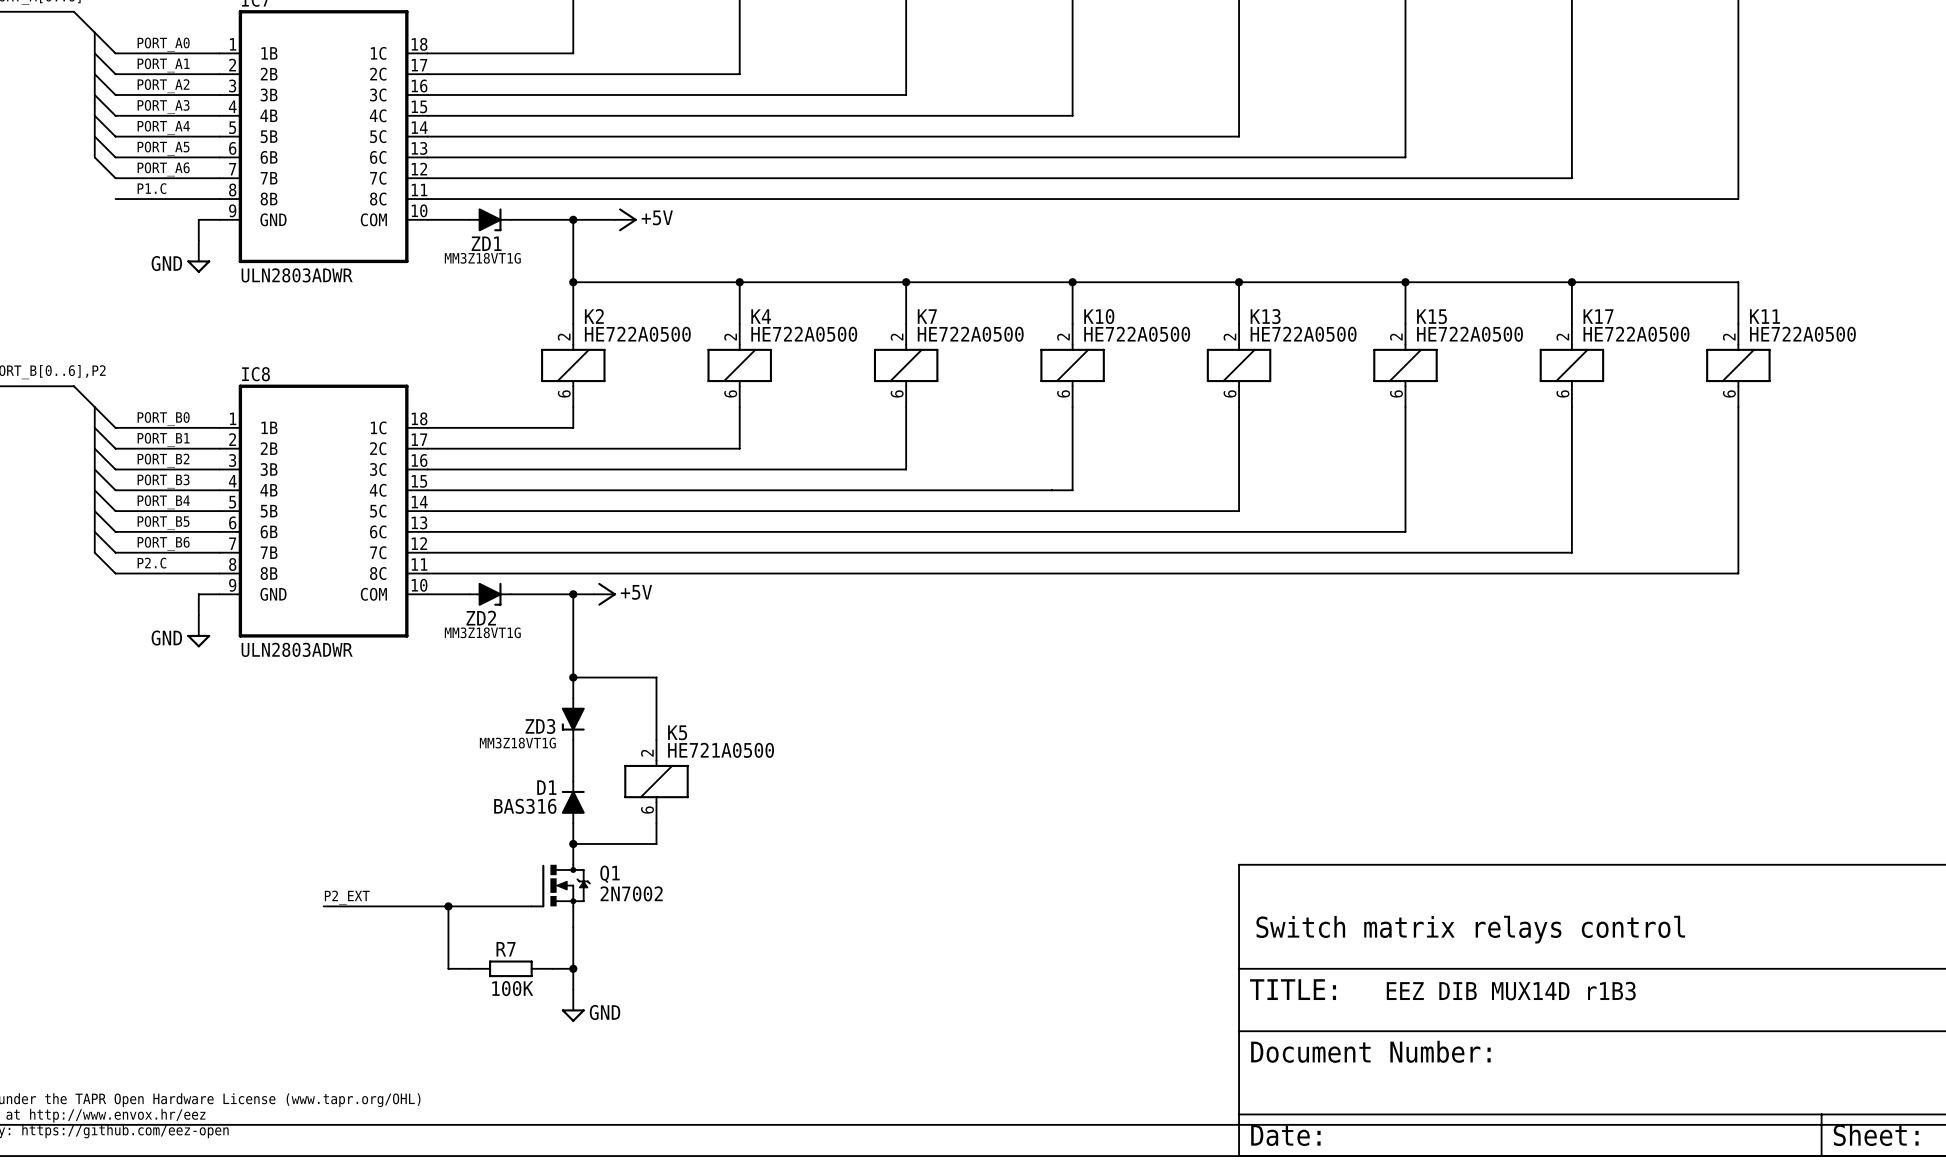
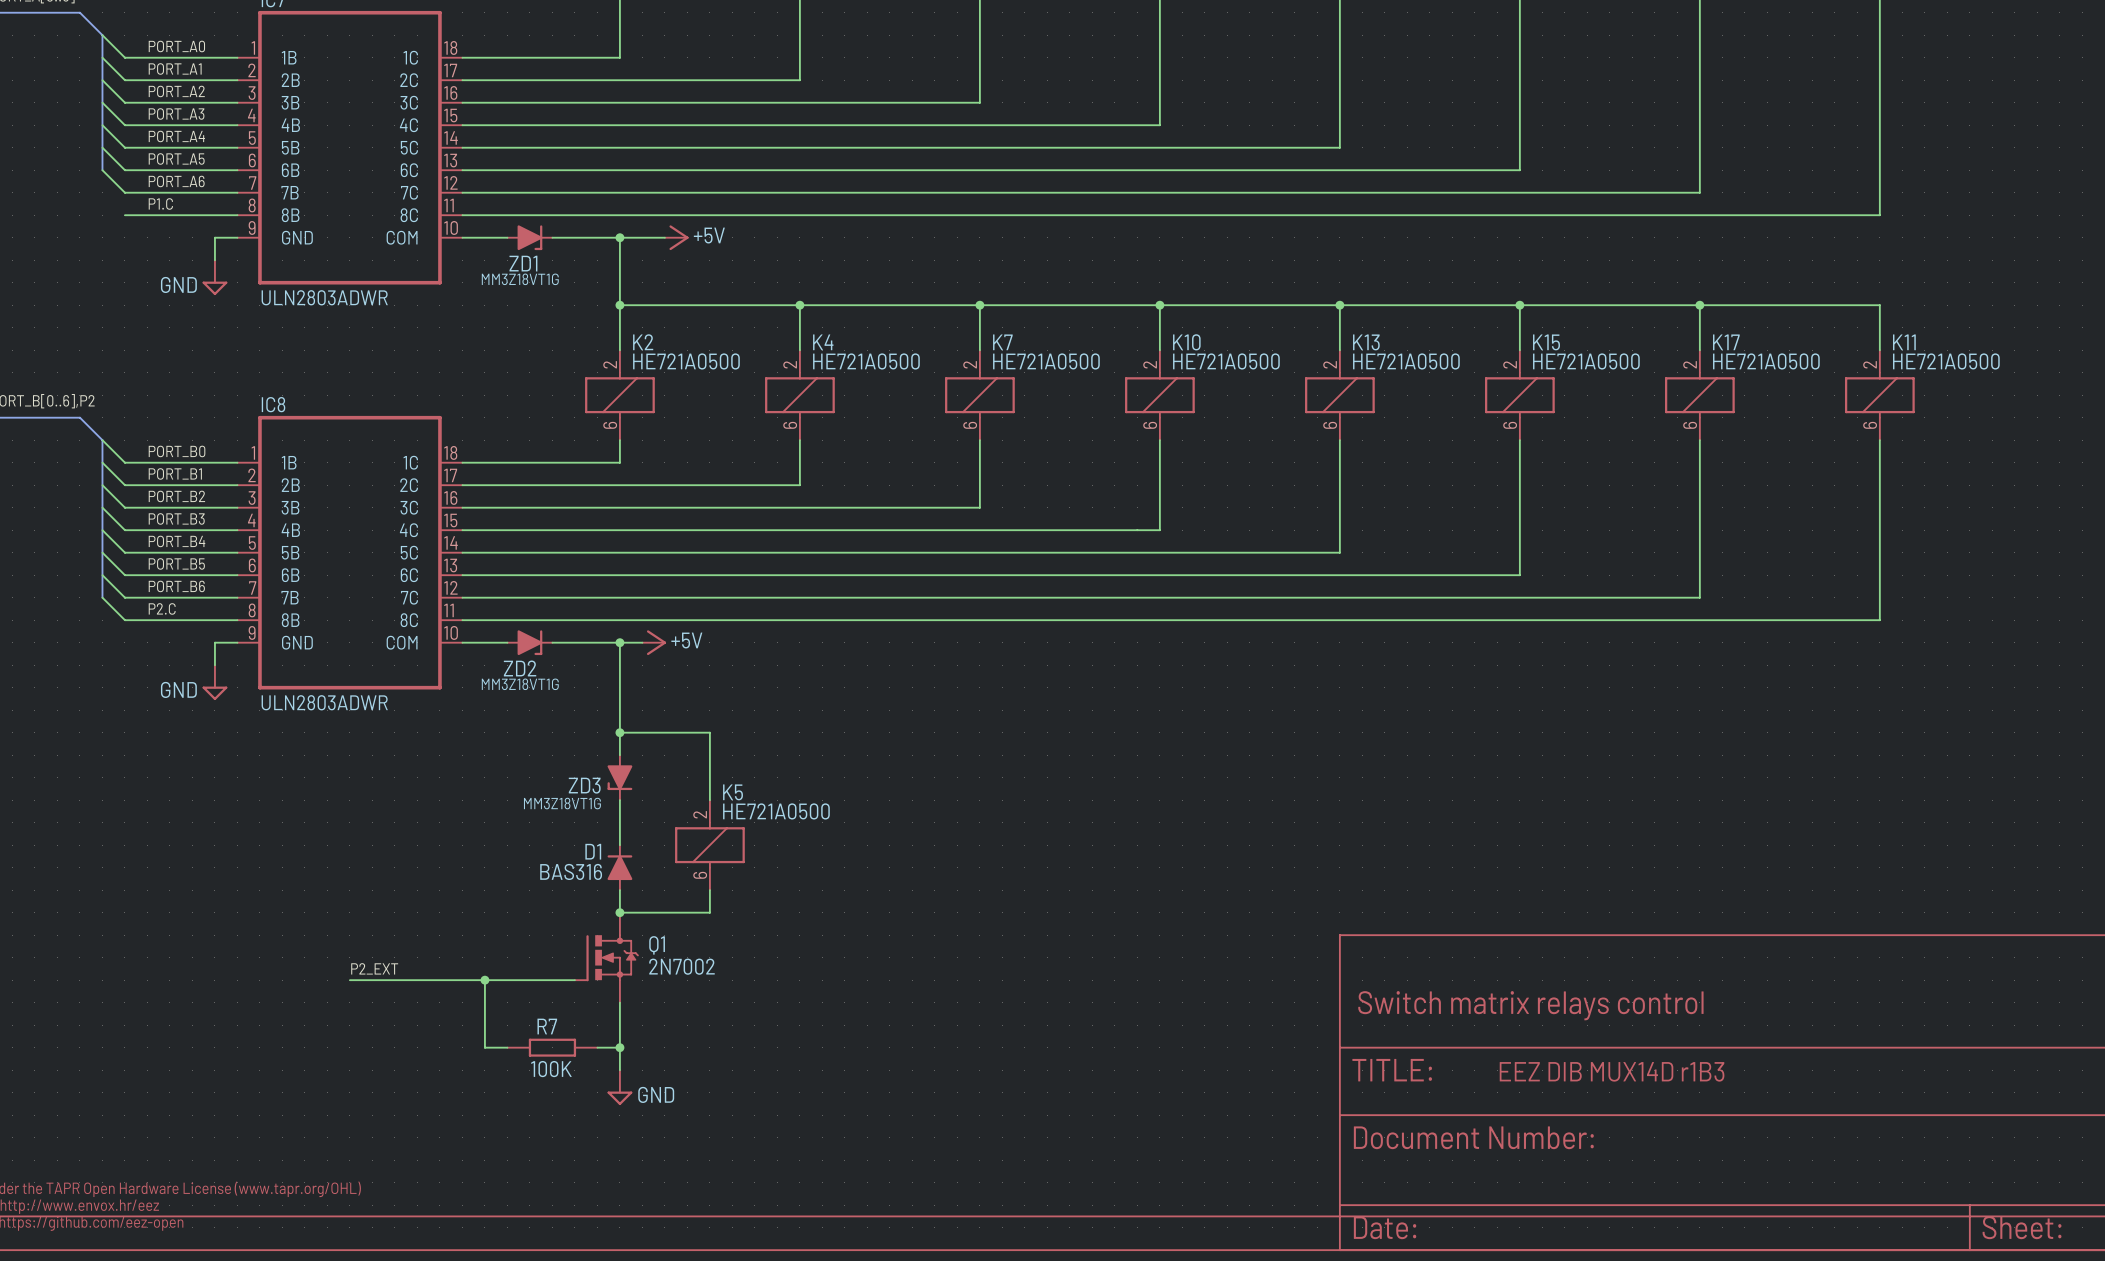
K2 value: HE722A0500 (637, 334) -> HE721A0500 (686, 361)
K4 value: HE722A0500 (804, 334) -> HE721A0500 (866, 361)
K7 value: HE722A0500 (970, 334) -> HE721A0500 (1046, 361)
K10 value: HE722A0500 (1137, 334) -> HE721A0500 (1226, 361)
K13 value: HE722A0500 (1303, 334) -> HE721A0500 (1406, 361)
K15 value: HE722A0500 (1470, 334) -> HE721A0500 (1586, 361)
K17 value: HE722A0500 (1636, 334) -> HE721A0500 (1766, 361)
K11 value: HE722A0500 (1802, 334) -> HE721A0500 (1946, 361)

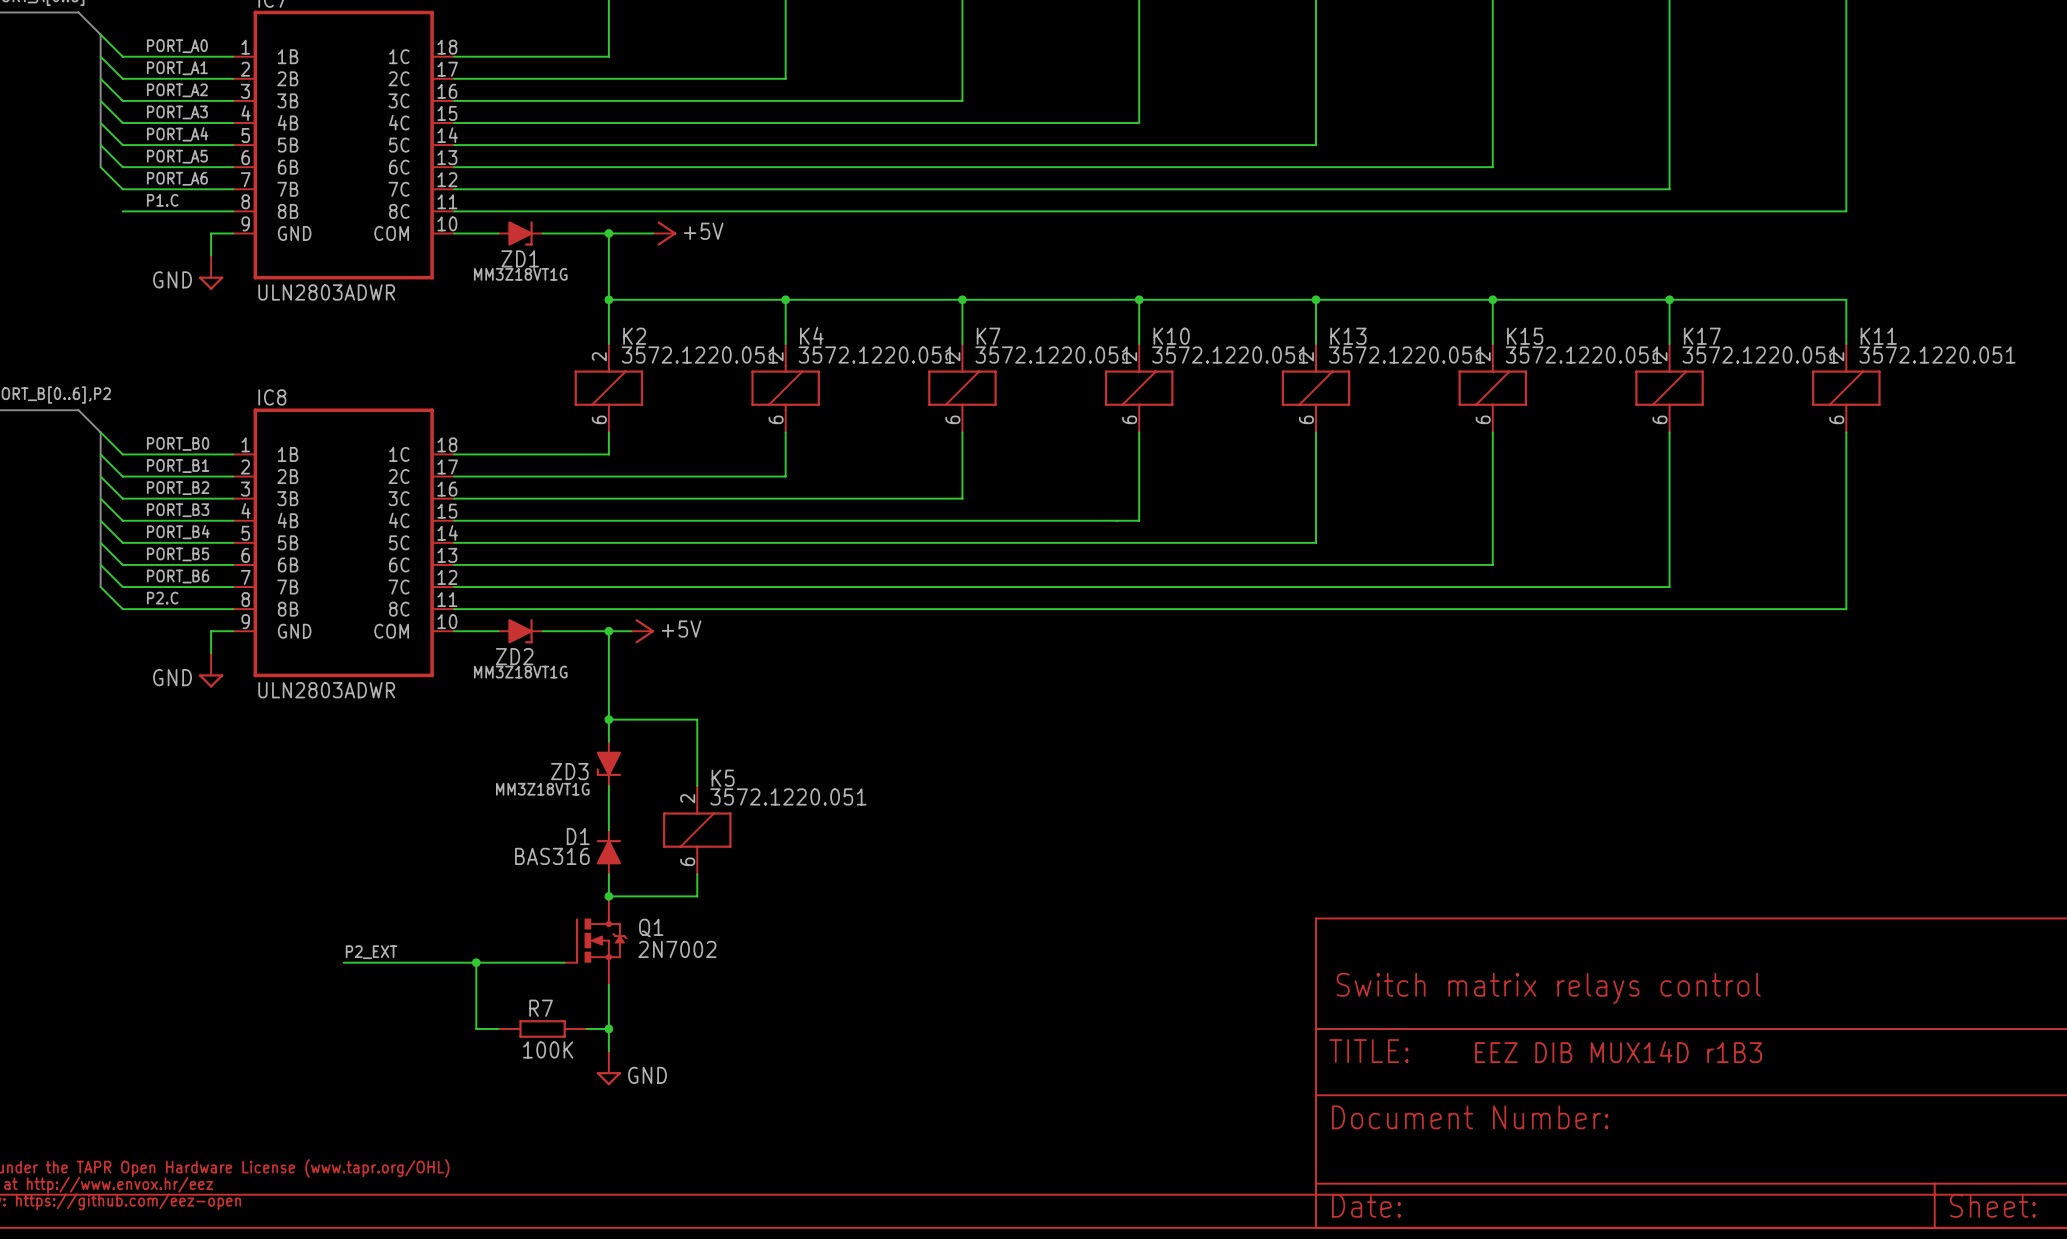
K2 value: HE721A0500 (686, 361) -> 3572.1220.051 (699, 355)
K4 value: HE721A0500 (866, 361) -> 3572.1220.051 (876, 355)
K7 value: HE721A0500 (1046, 361) -> 3572.1220.051 (1053, 355)
K10 value: HE721A0500 (1226, 361) -> 3572.1220.051 (1230, 355)
K13 value: HE721A0500 (1406, 361) -> 3572.1220.051 (1407, 355)
K15 value: HE721A0500 (1586, 361) -> 3572.1220.051 (1583, 355)
K17 value: HE721A0500 (1766, 361) -> 3572.1220.051 (1760, 355)
K11 value: HE721A0500 (1946, 361) -> 3572.1220.051 (1937, 355)
K5 value: HE721A0500 (776, 811) -> 3572.1220.051 (788, 796)

